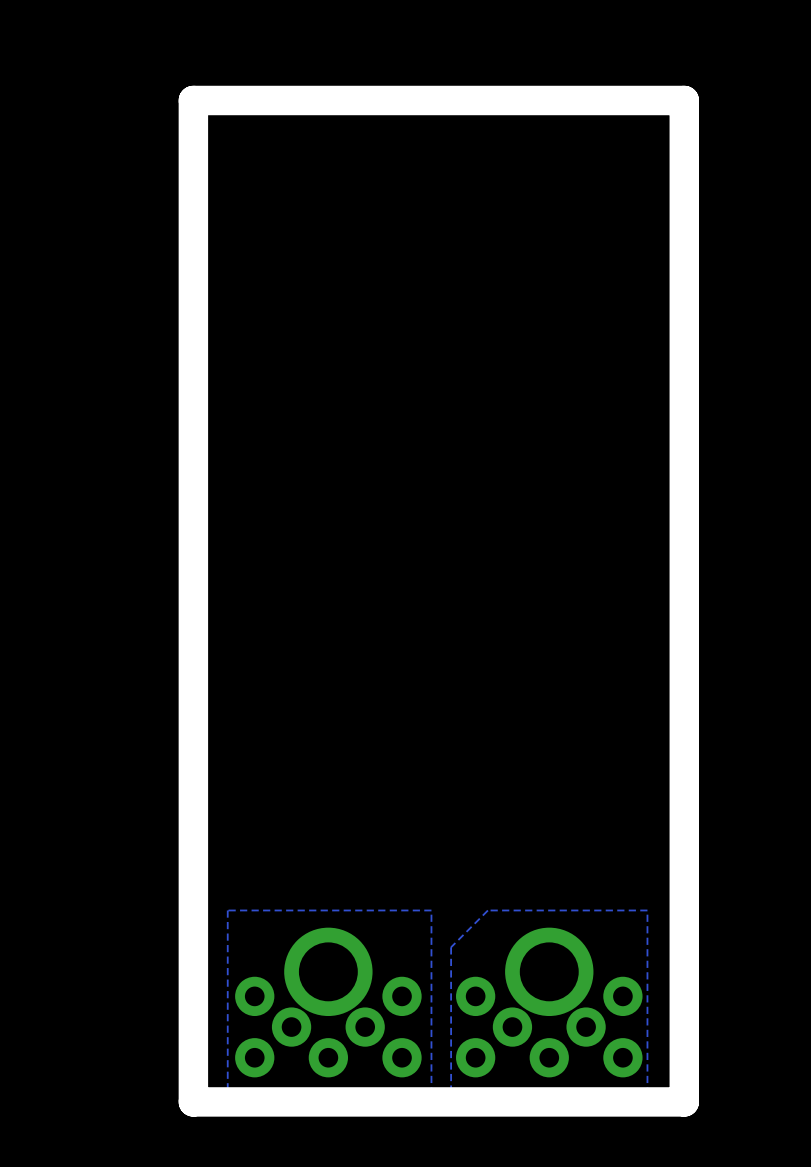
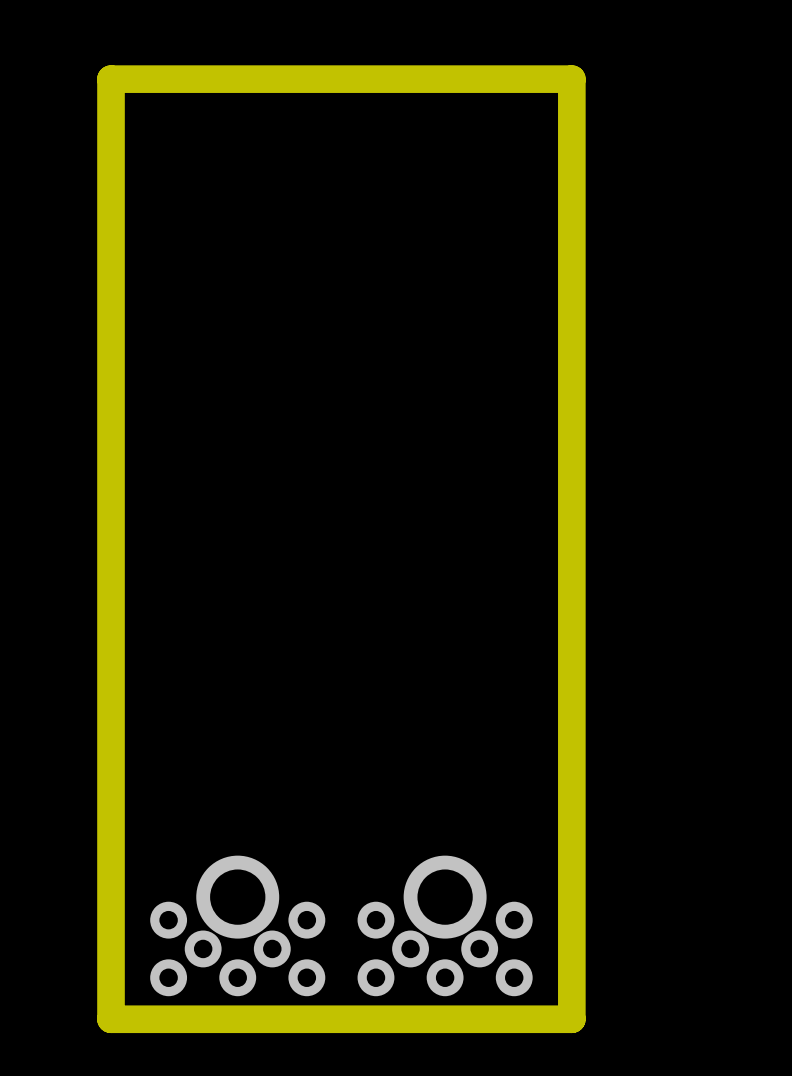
zone outline: (431, 910) (227, 910) (227, 1094) (431, 1094) (431, 910) -> none
zone outline: (647, 910) (647, 1094) (451, 1094) (451, 947) (487, 910) (647, 910) -> none

